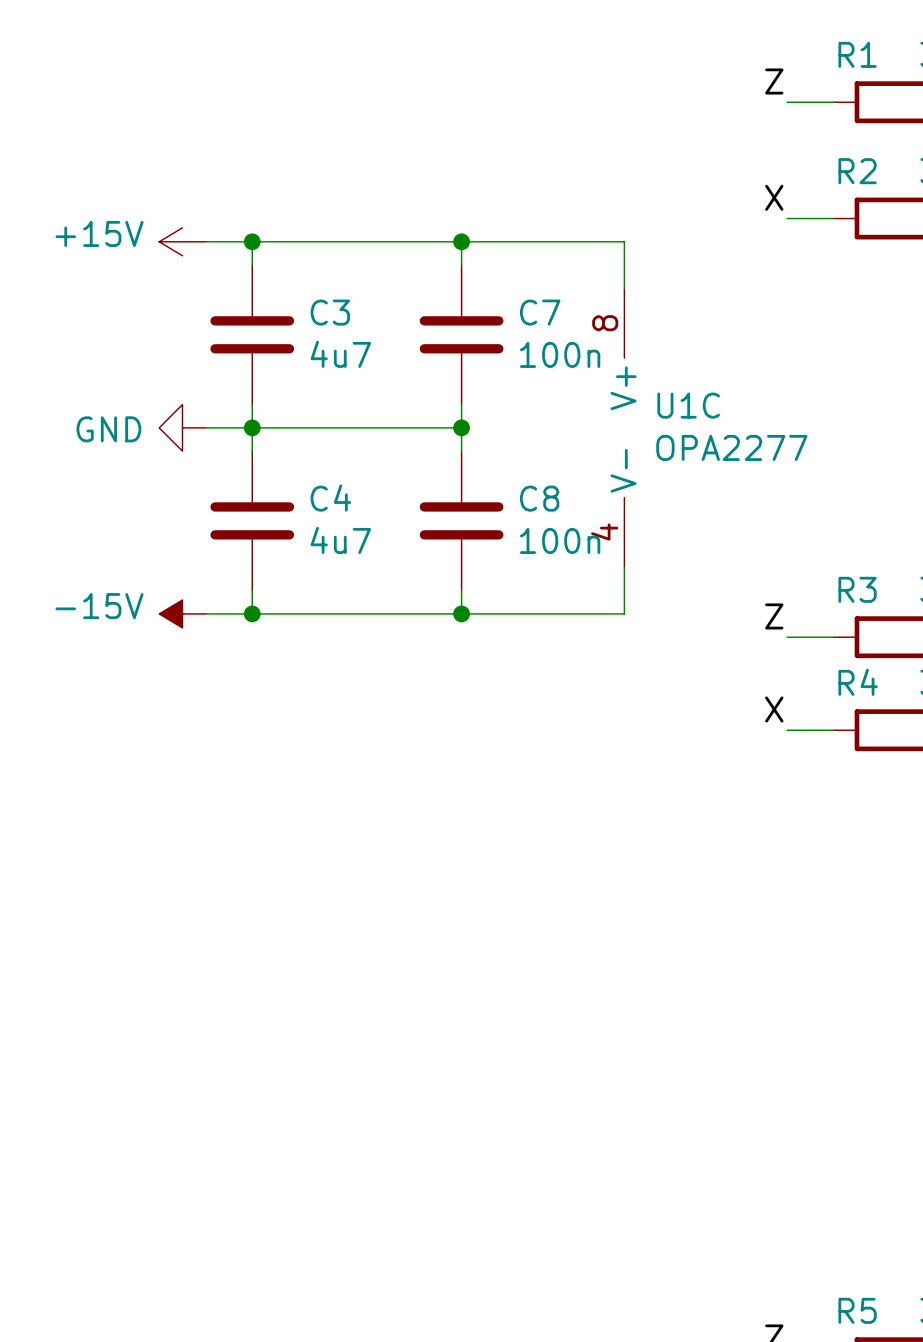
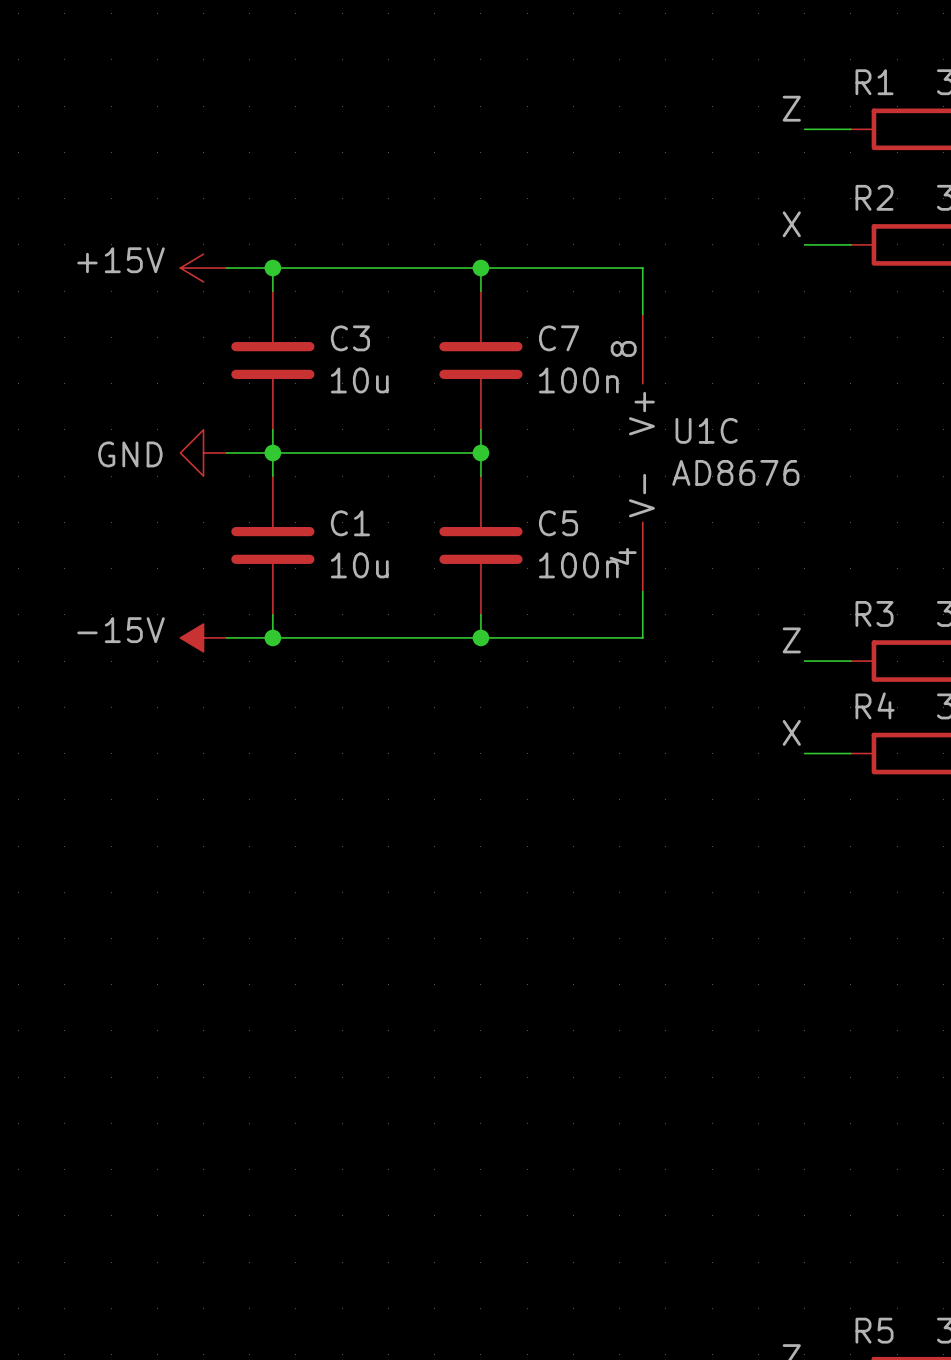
C3 value: 4u7 (340, 354) -> 10u (359, 380)
U1C value: OPA2277 (731, 447) -> AD8676 (735, 472)
C4 name: C4 (330, 498) -> C1 (350, 523)
C8 name: C8 (539, 498) -> C5 (558, 523)
C4 value: 4u7 (340, 540) -> 10u (359, 565)

